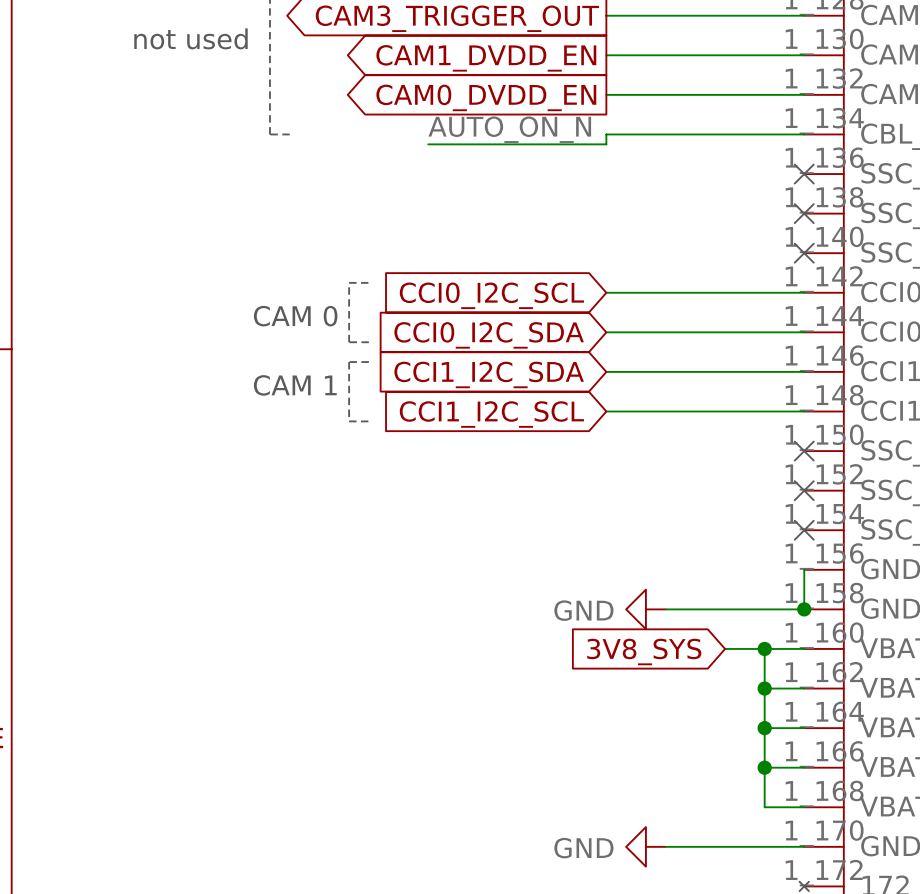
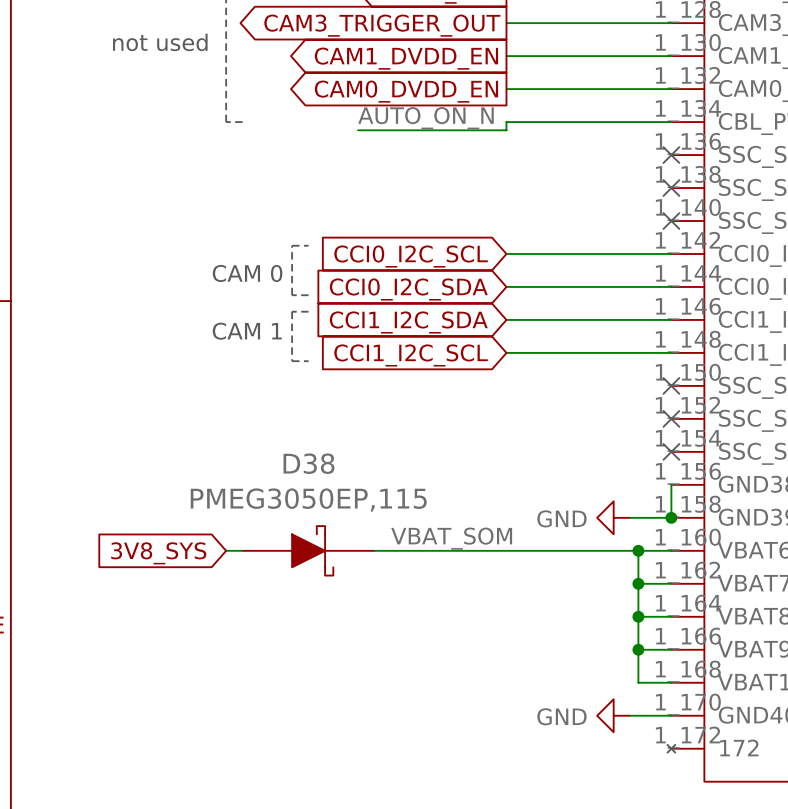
power symbol position: GND (645, 609) -> GND (613, 517)
wire: (665, 609) (754, 609) -> none
label: none -> VBAT_SOM (451, 538)
wire: none -> (226, 550) (242, 550)
D38: none -> PMEG3050EP,115 (308, 550)
wire: none -> (374, 550) (605, 550)
global label: none -> 3V8_SYS (158, 553)
global label: 3V8_SYS (644, 651) -> none
power symbol position: GND (645, 846) -> GND (613, 715)
wire: (665, 846) (754, 846) -> none

